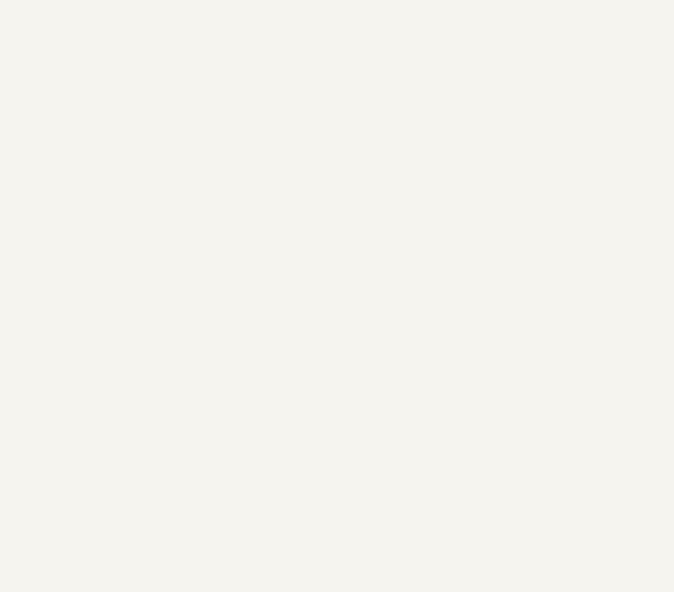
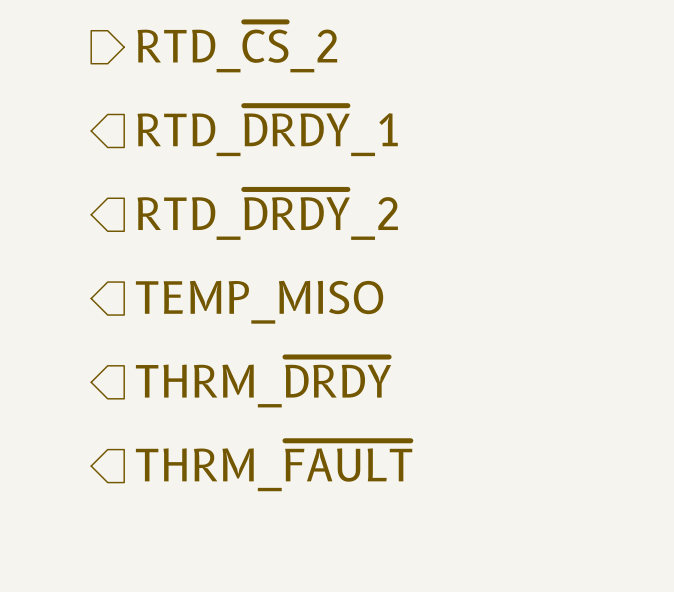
hierarchical label: none -> RTD_~{CS}_2 (237, 47)
hierarchical label: none -> RTD_~{DRDY}_1 (267, 130)
hierarchical label: none -> RTD_~{DRDY}_2 (267, 214)
hierarchical label: none -> TEMP_MISO (259, 302)
hierarchical label: none -> THRM_~{DRDY} (263, 382)
hierarchical label: none -> THRM_~{FAULT} (274, 465)

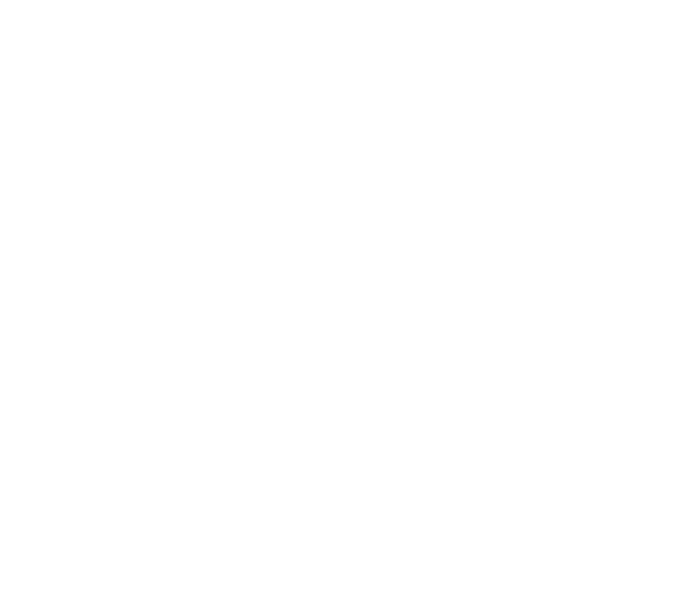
hierarchical label: RTD_~{CS}_2 (237, 47) -> none
hierarchical label: RTD_~{DRDY}_1 (267, 130) -> none
hierarchical label: RTD_~{DRDY}_2 (267, 214) -> none
hierarchical label: TEMP_MISO (259, 302) -> none
hierarchical label: THRM_~{DRDY} (263, 382) -> none
hierarchical label: THRM_~{FAULT} (274, 465) -> none

